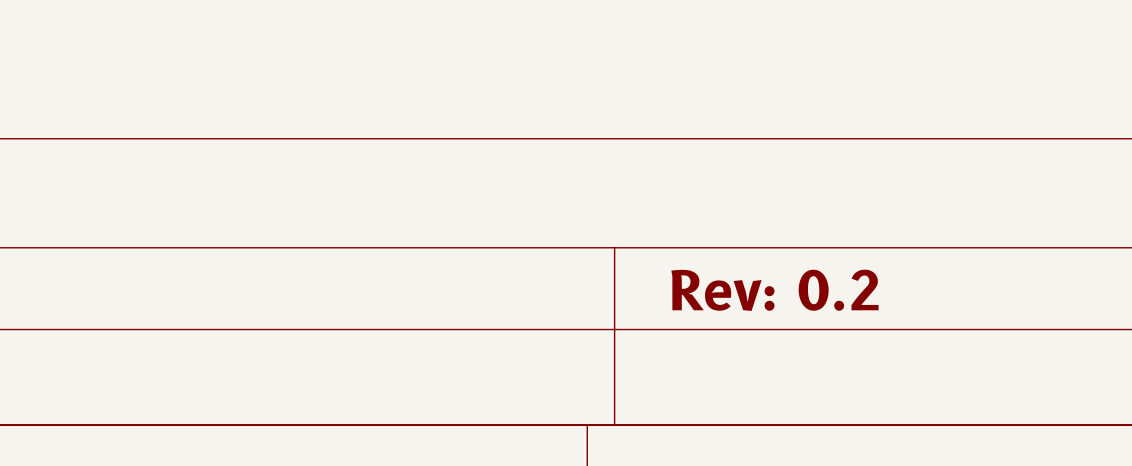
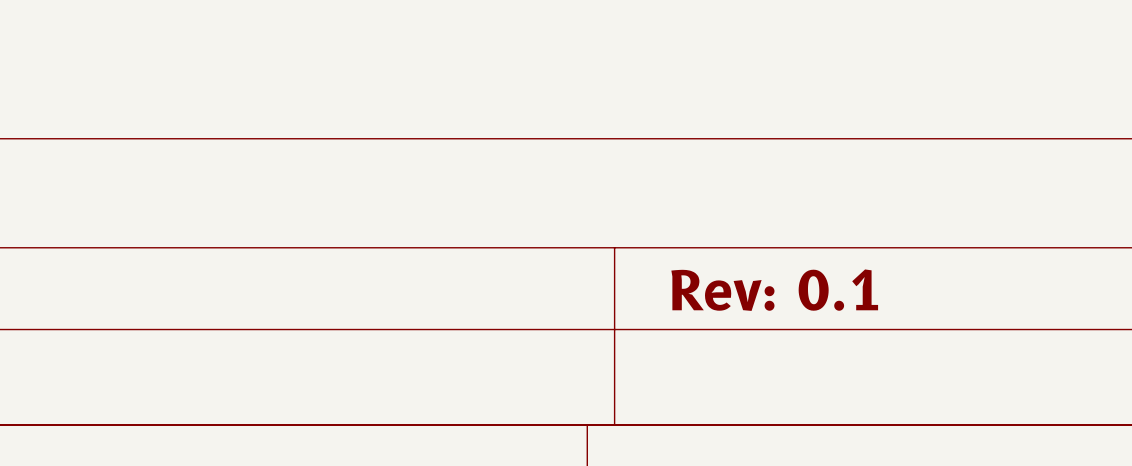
title block: Rev: 0.2 (774, 290) -> Rev: 0.1 (774, 290)

